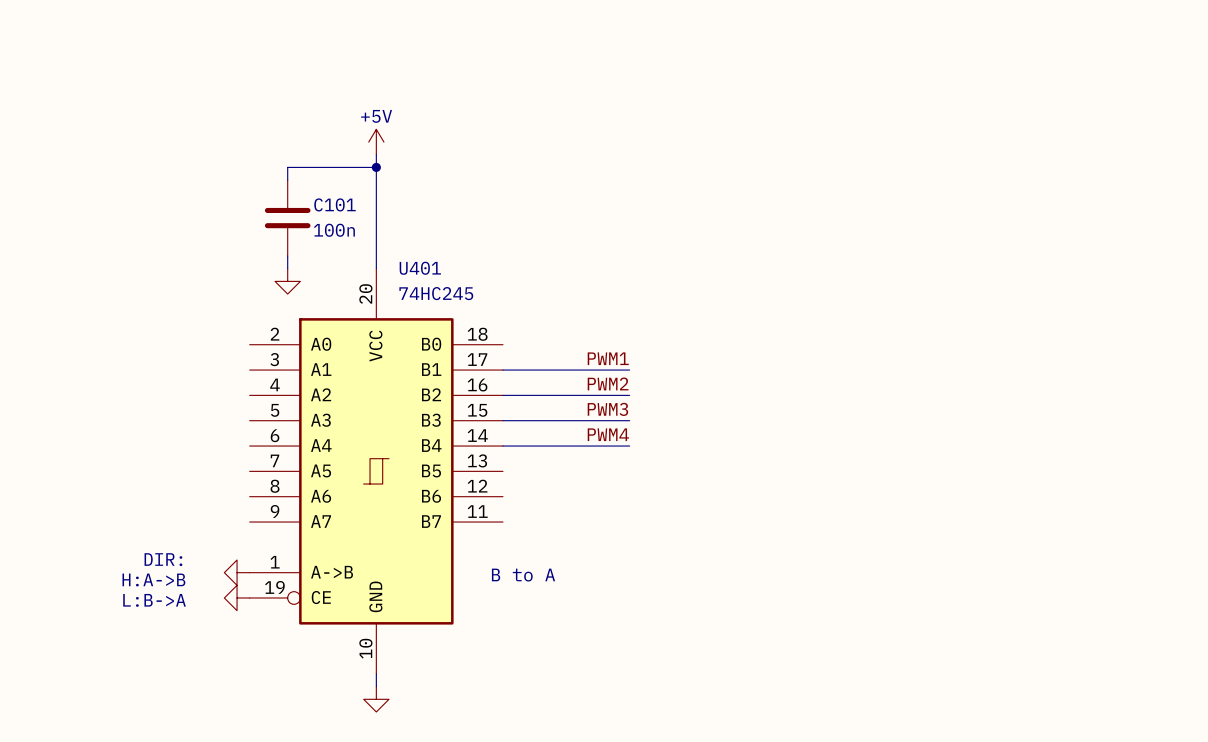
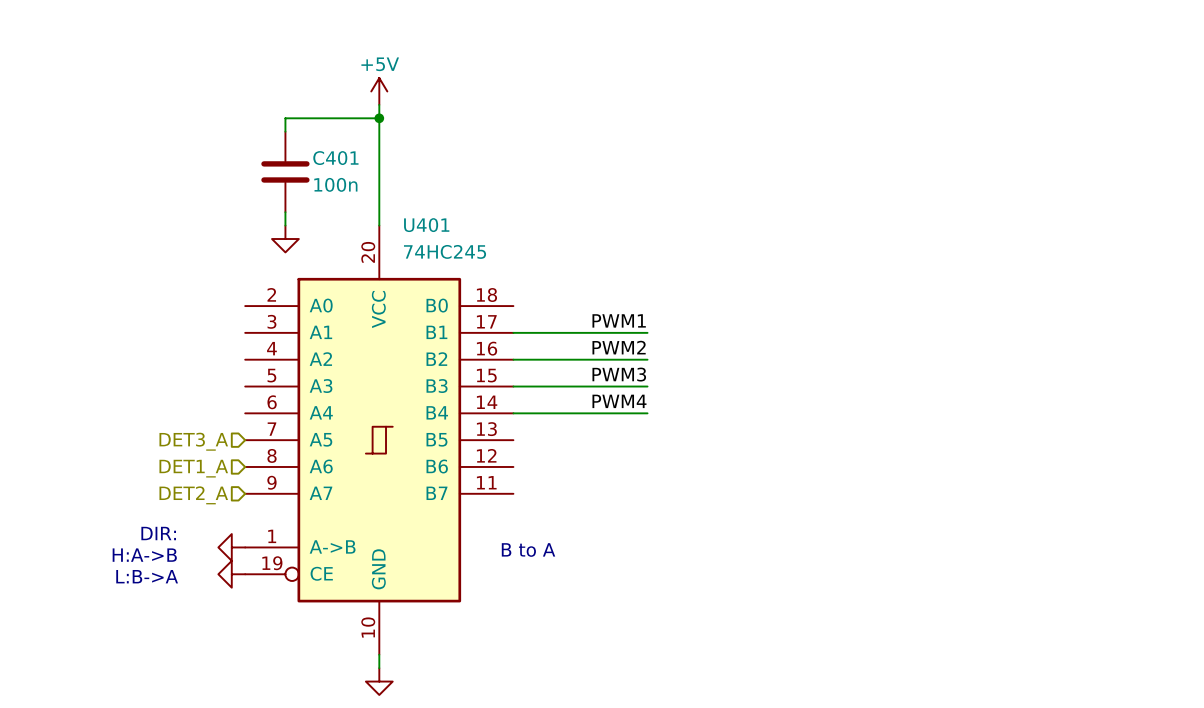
C101 name: C101 (335, 204) -> C401 (335, 158)
hierarchical label: none -> DET3_A (193, 441)
hierarchical label: none -> DET1_A (193, 468)
hierarchical label: none -> DET2_A (193, 495)

